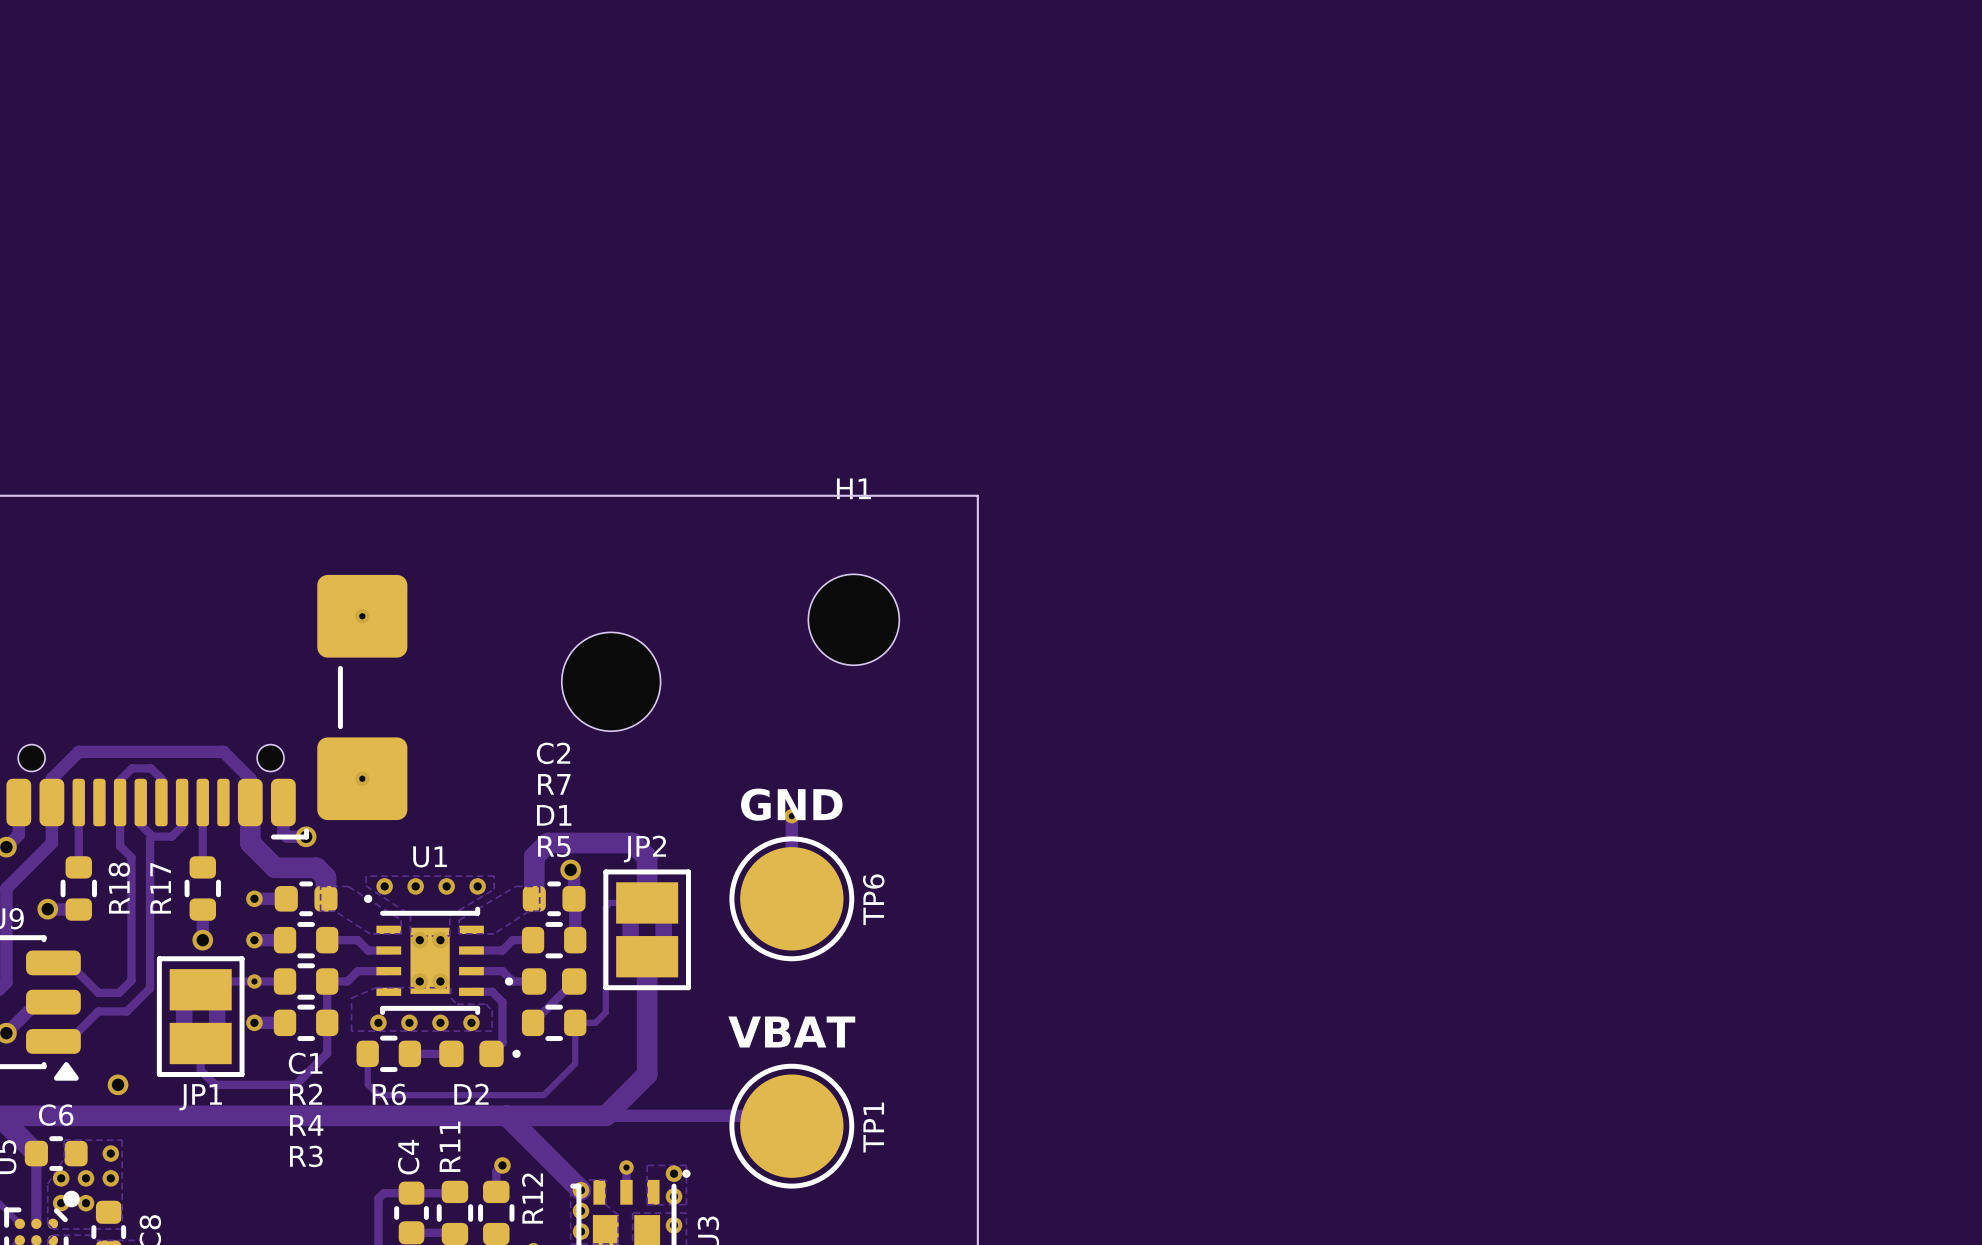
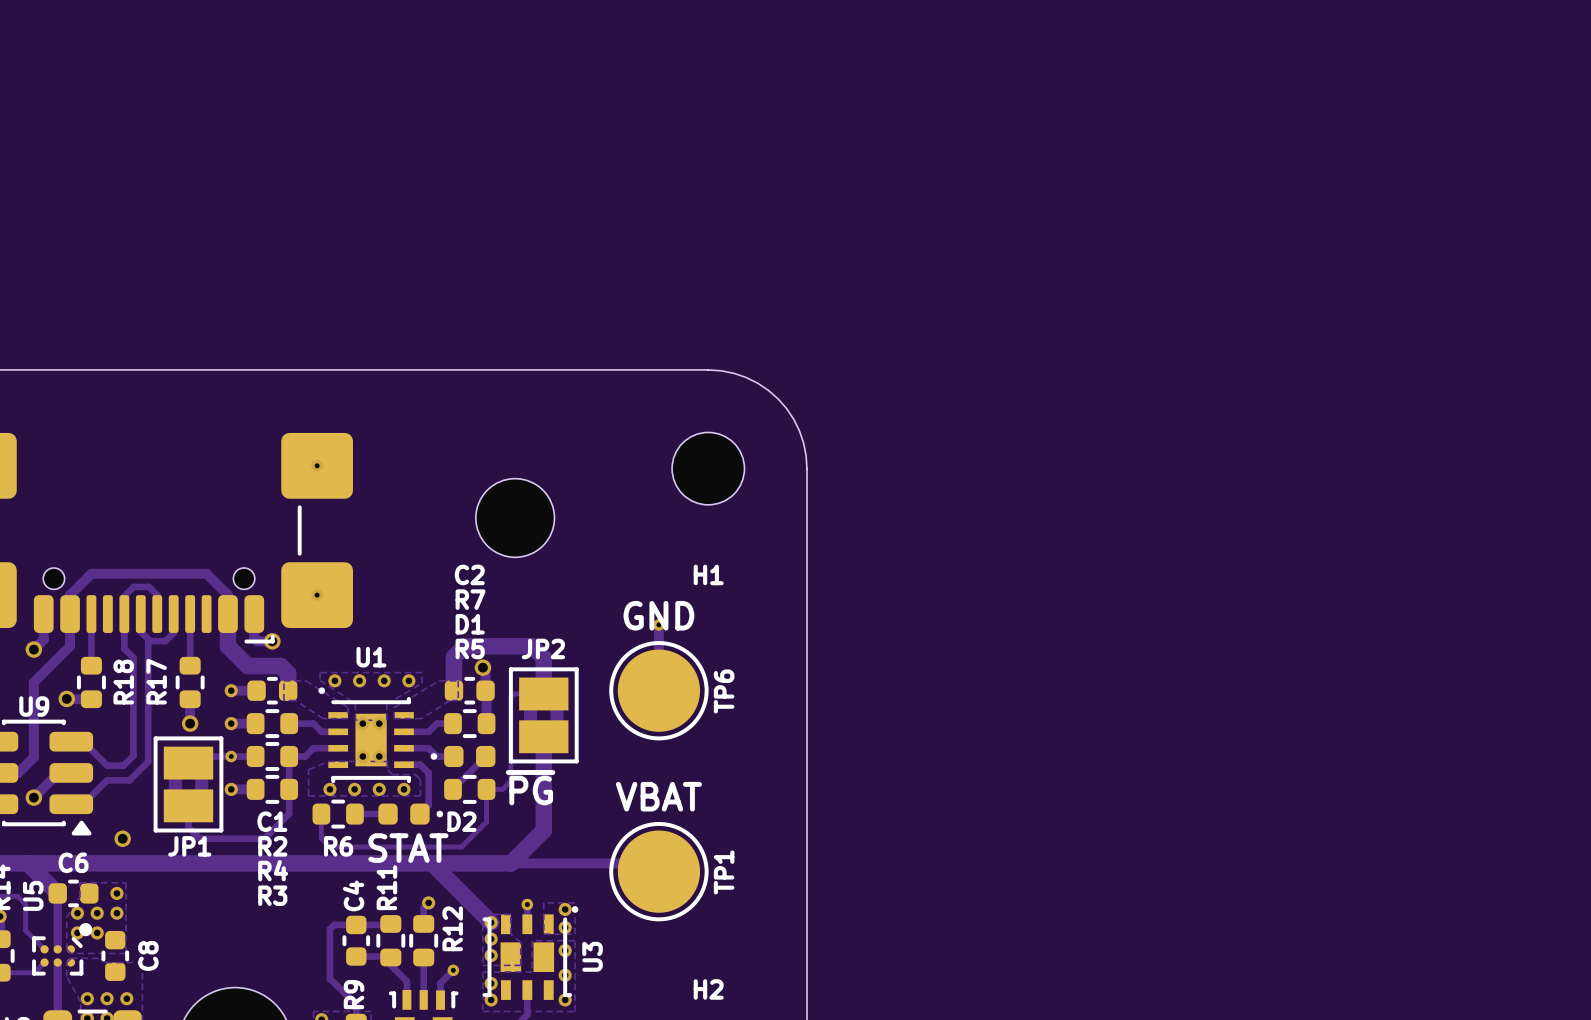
H1 name position: H1 (853, 488) -> H1 (708, 574)
board edge: (853, 495) (977, 495) (977, 619) -> (708, 369) (721, 370) (746, 377) (757, 383) (778, 398) (786, 408) (799, 430) (803, 443) (806, 468)
text: none -> ~{PG} (530, 787)
D2 name position: D2 (471, 1094) -> D2 (461, 821)
text: none -> STAT (408, 848)

